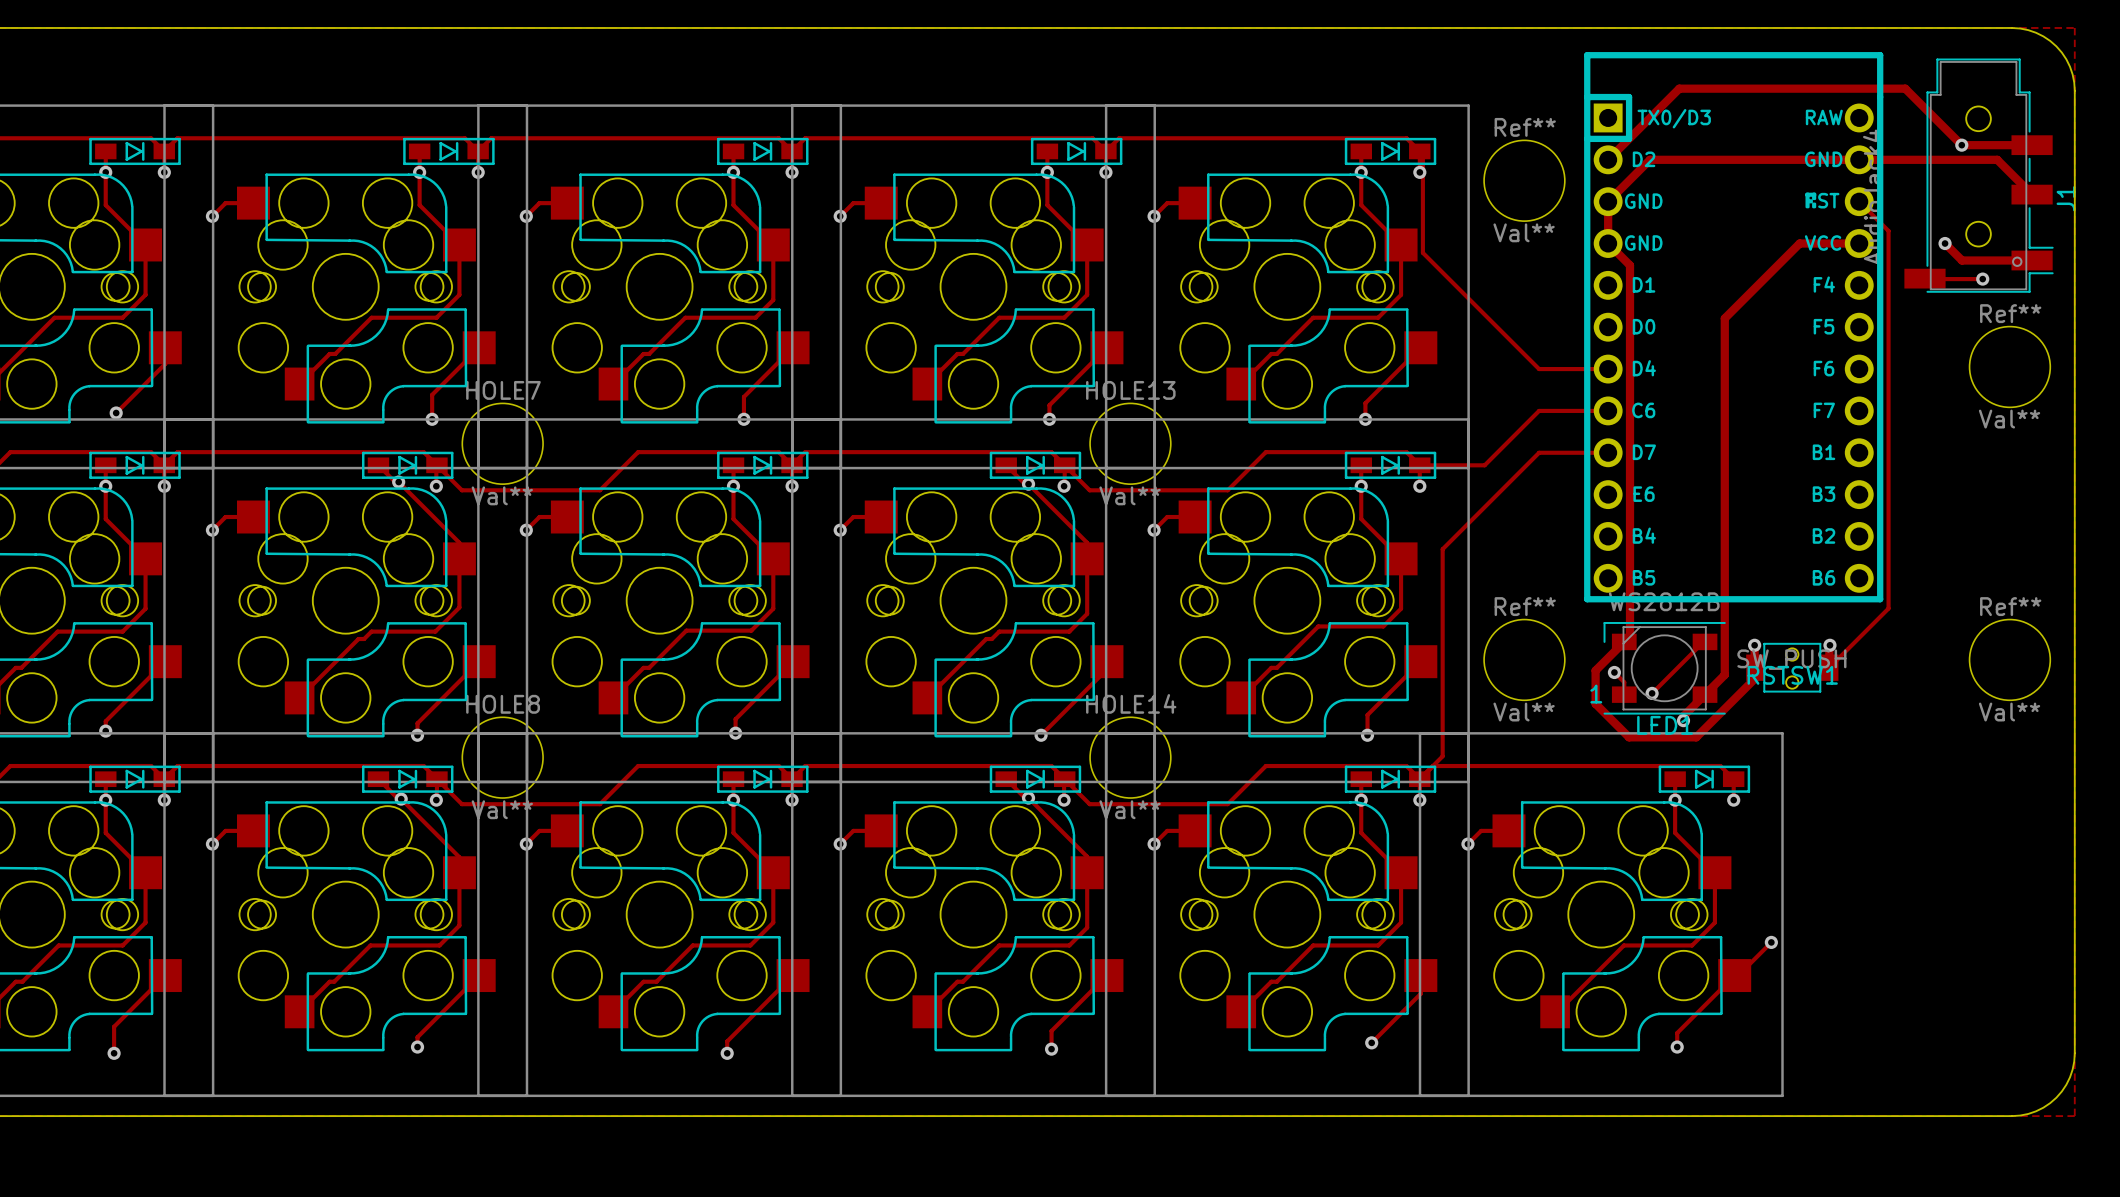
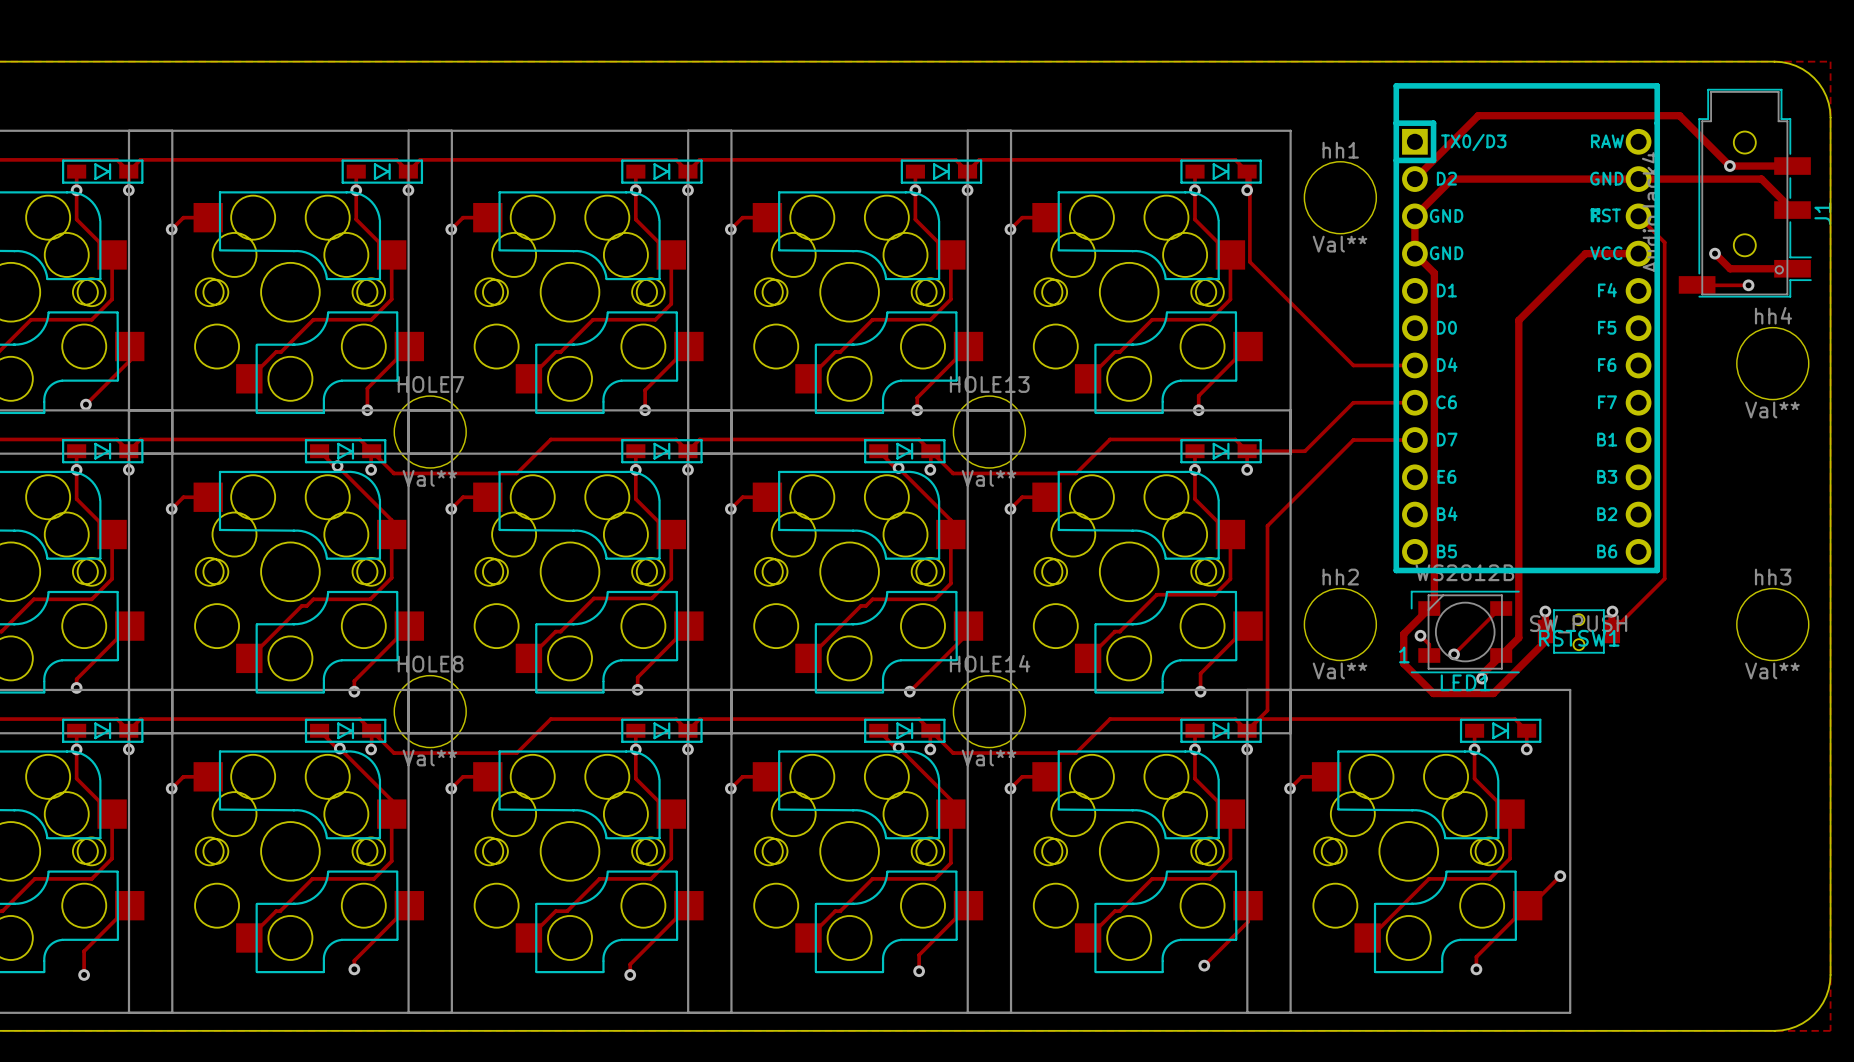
Ref** name: Ref** (1525, 127) -> hh1 (1340, 150)
Ref** name: Ref** (2010, 313) -> hh4 (1773, 315)
Ref** name: Ref** (1525, 606) -> hh2 (1340, 577)
Ref** name: Ref** (2010, 606) -> hh3 (1773, 577)

